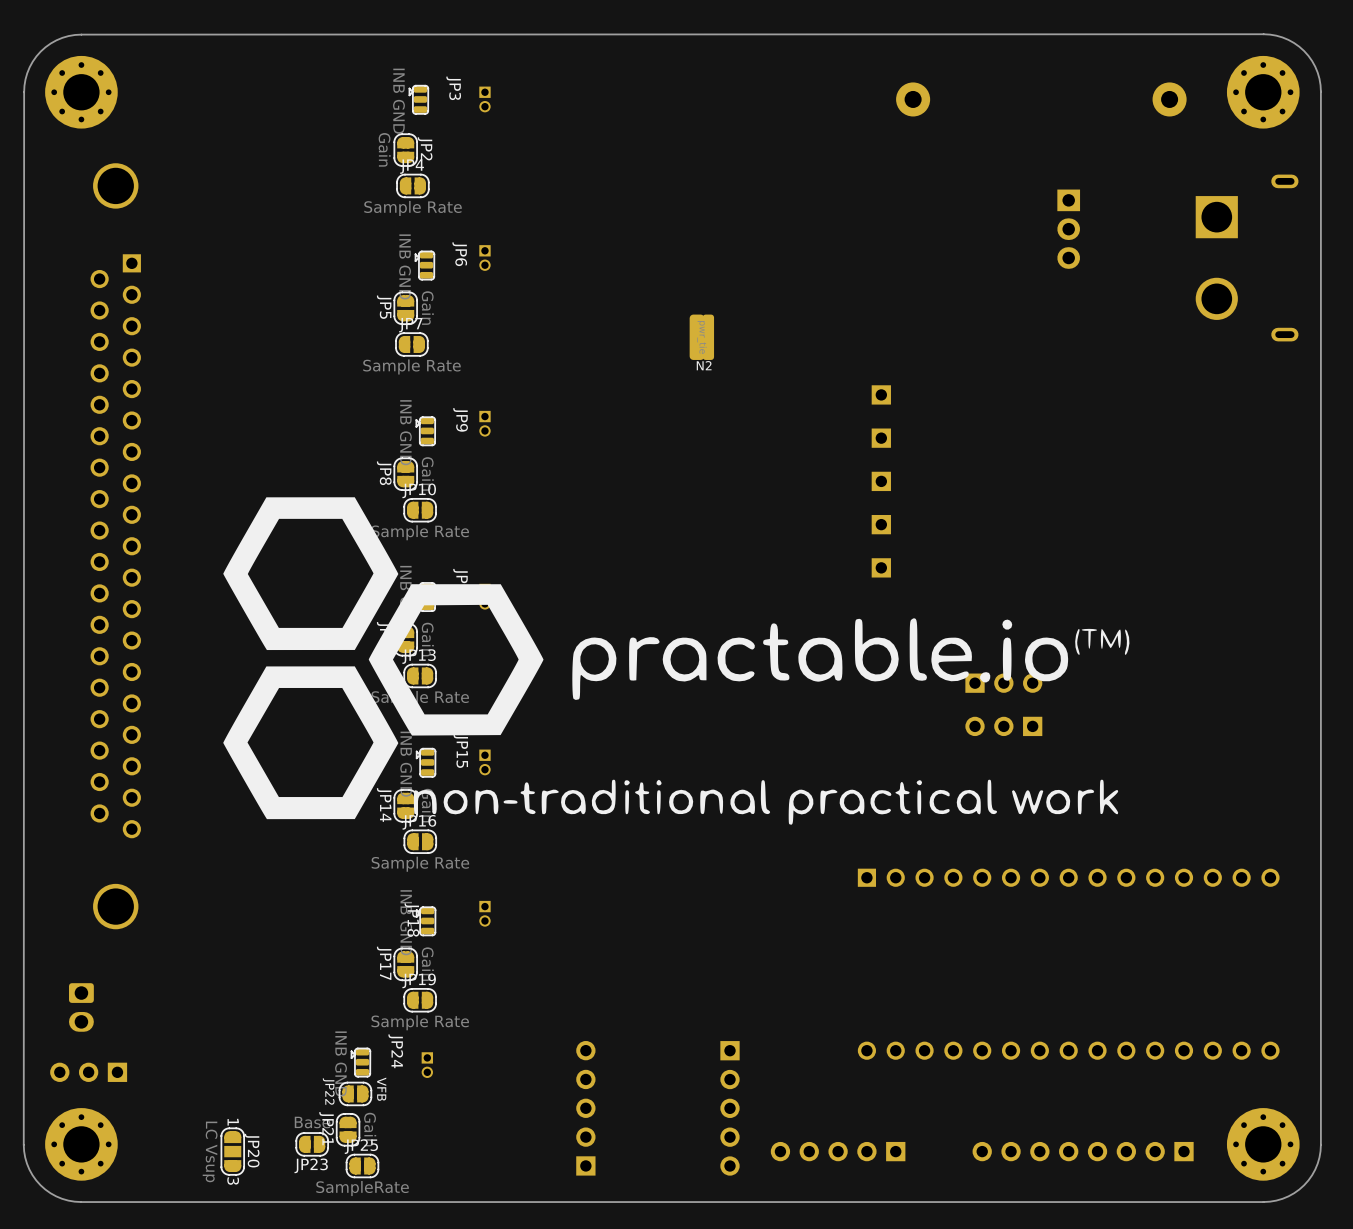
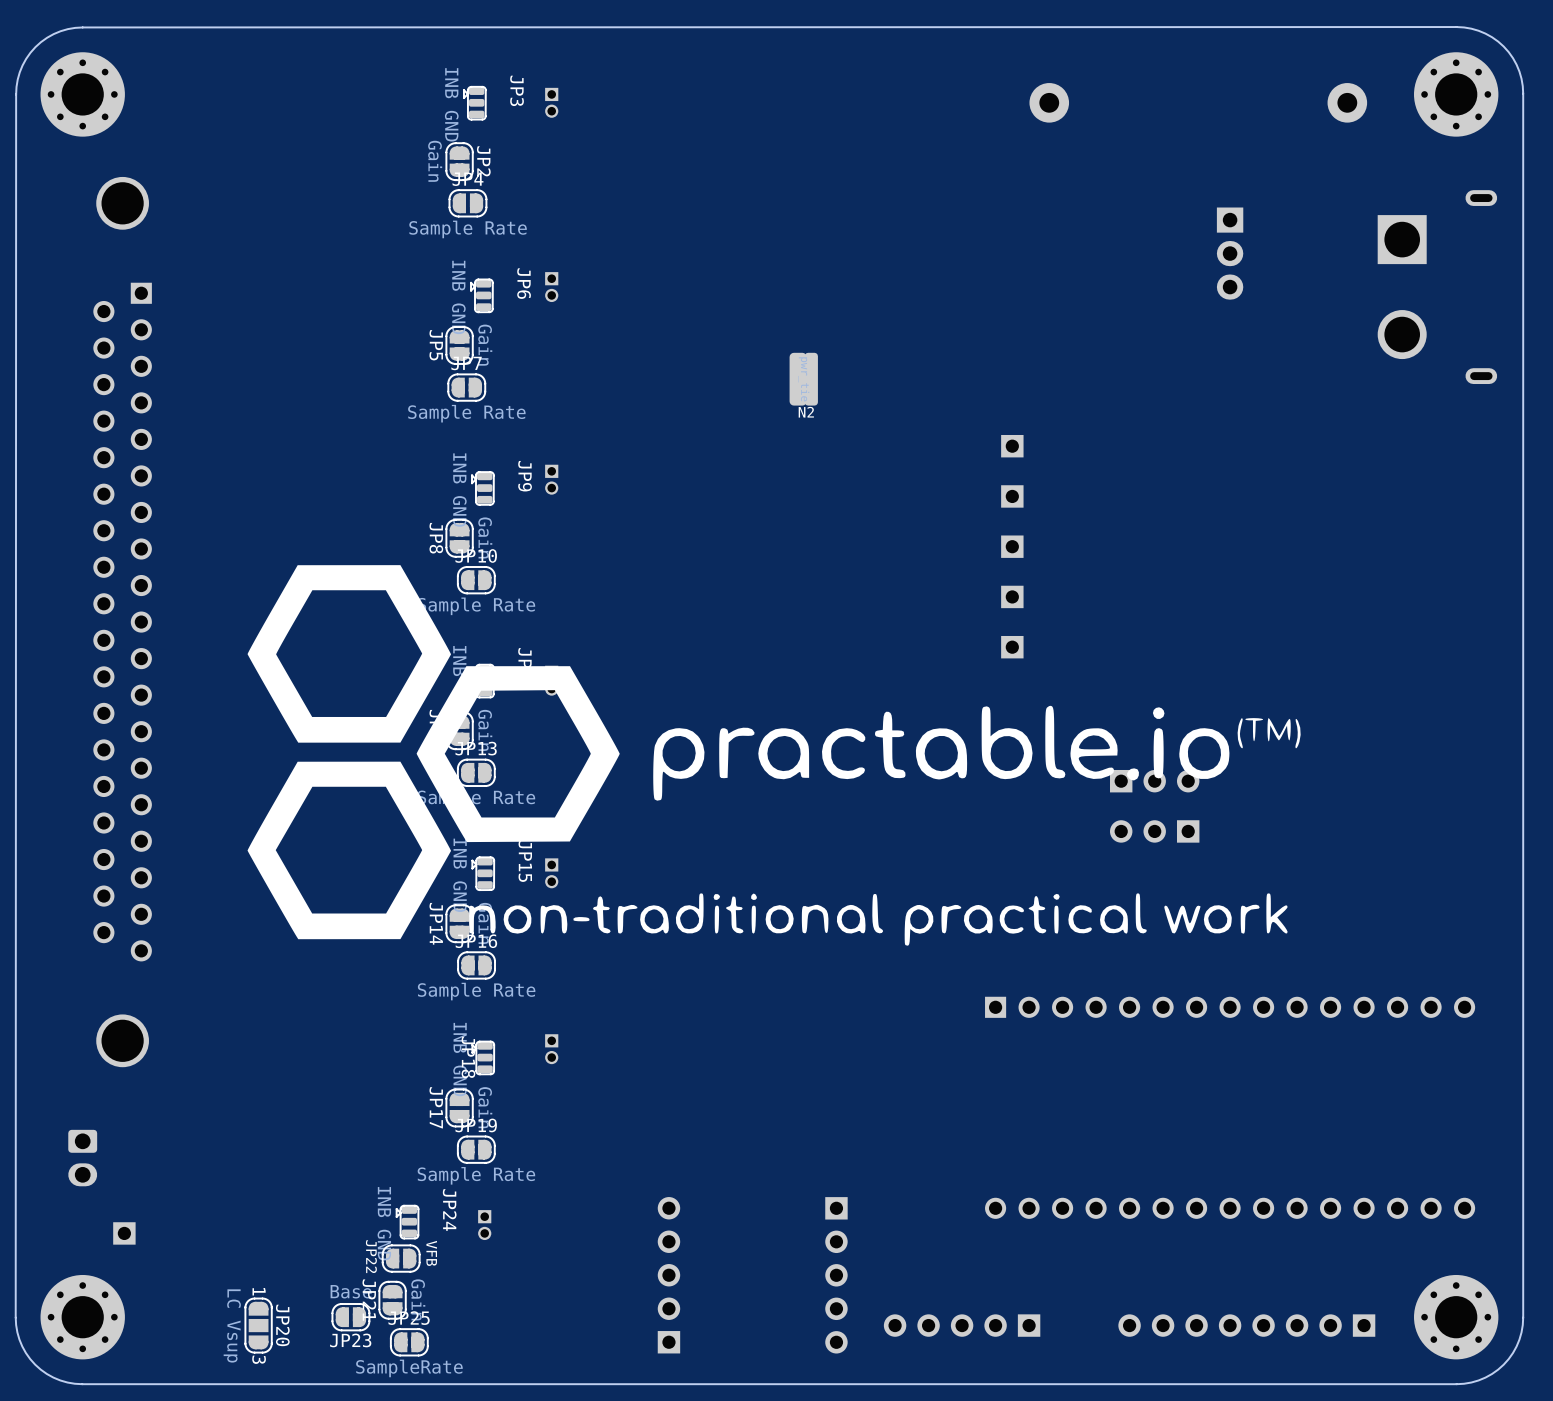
part: (88, 1072) -> none

